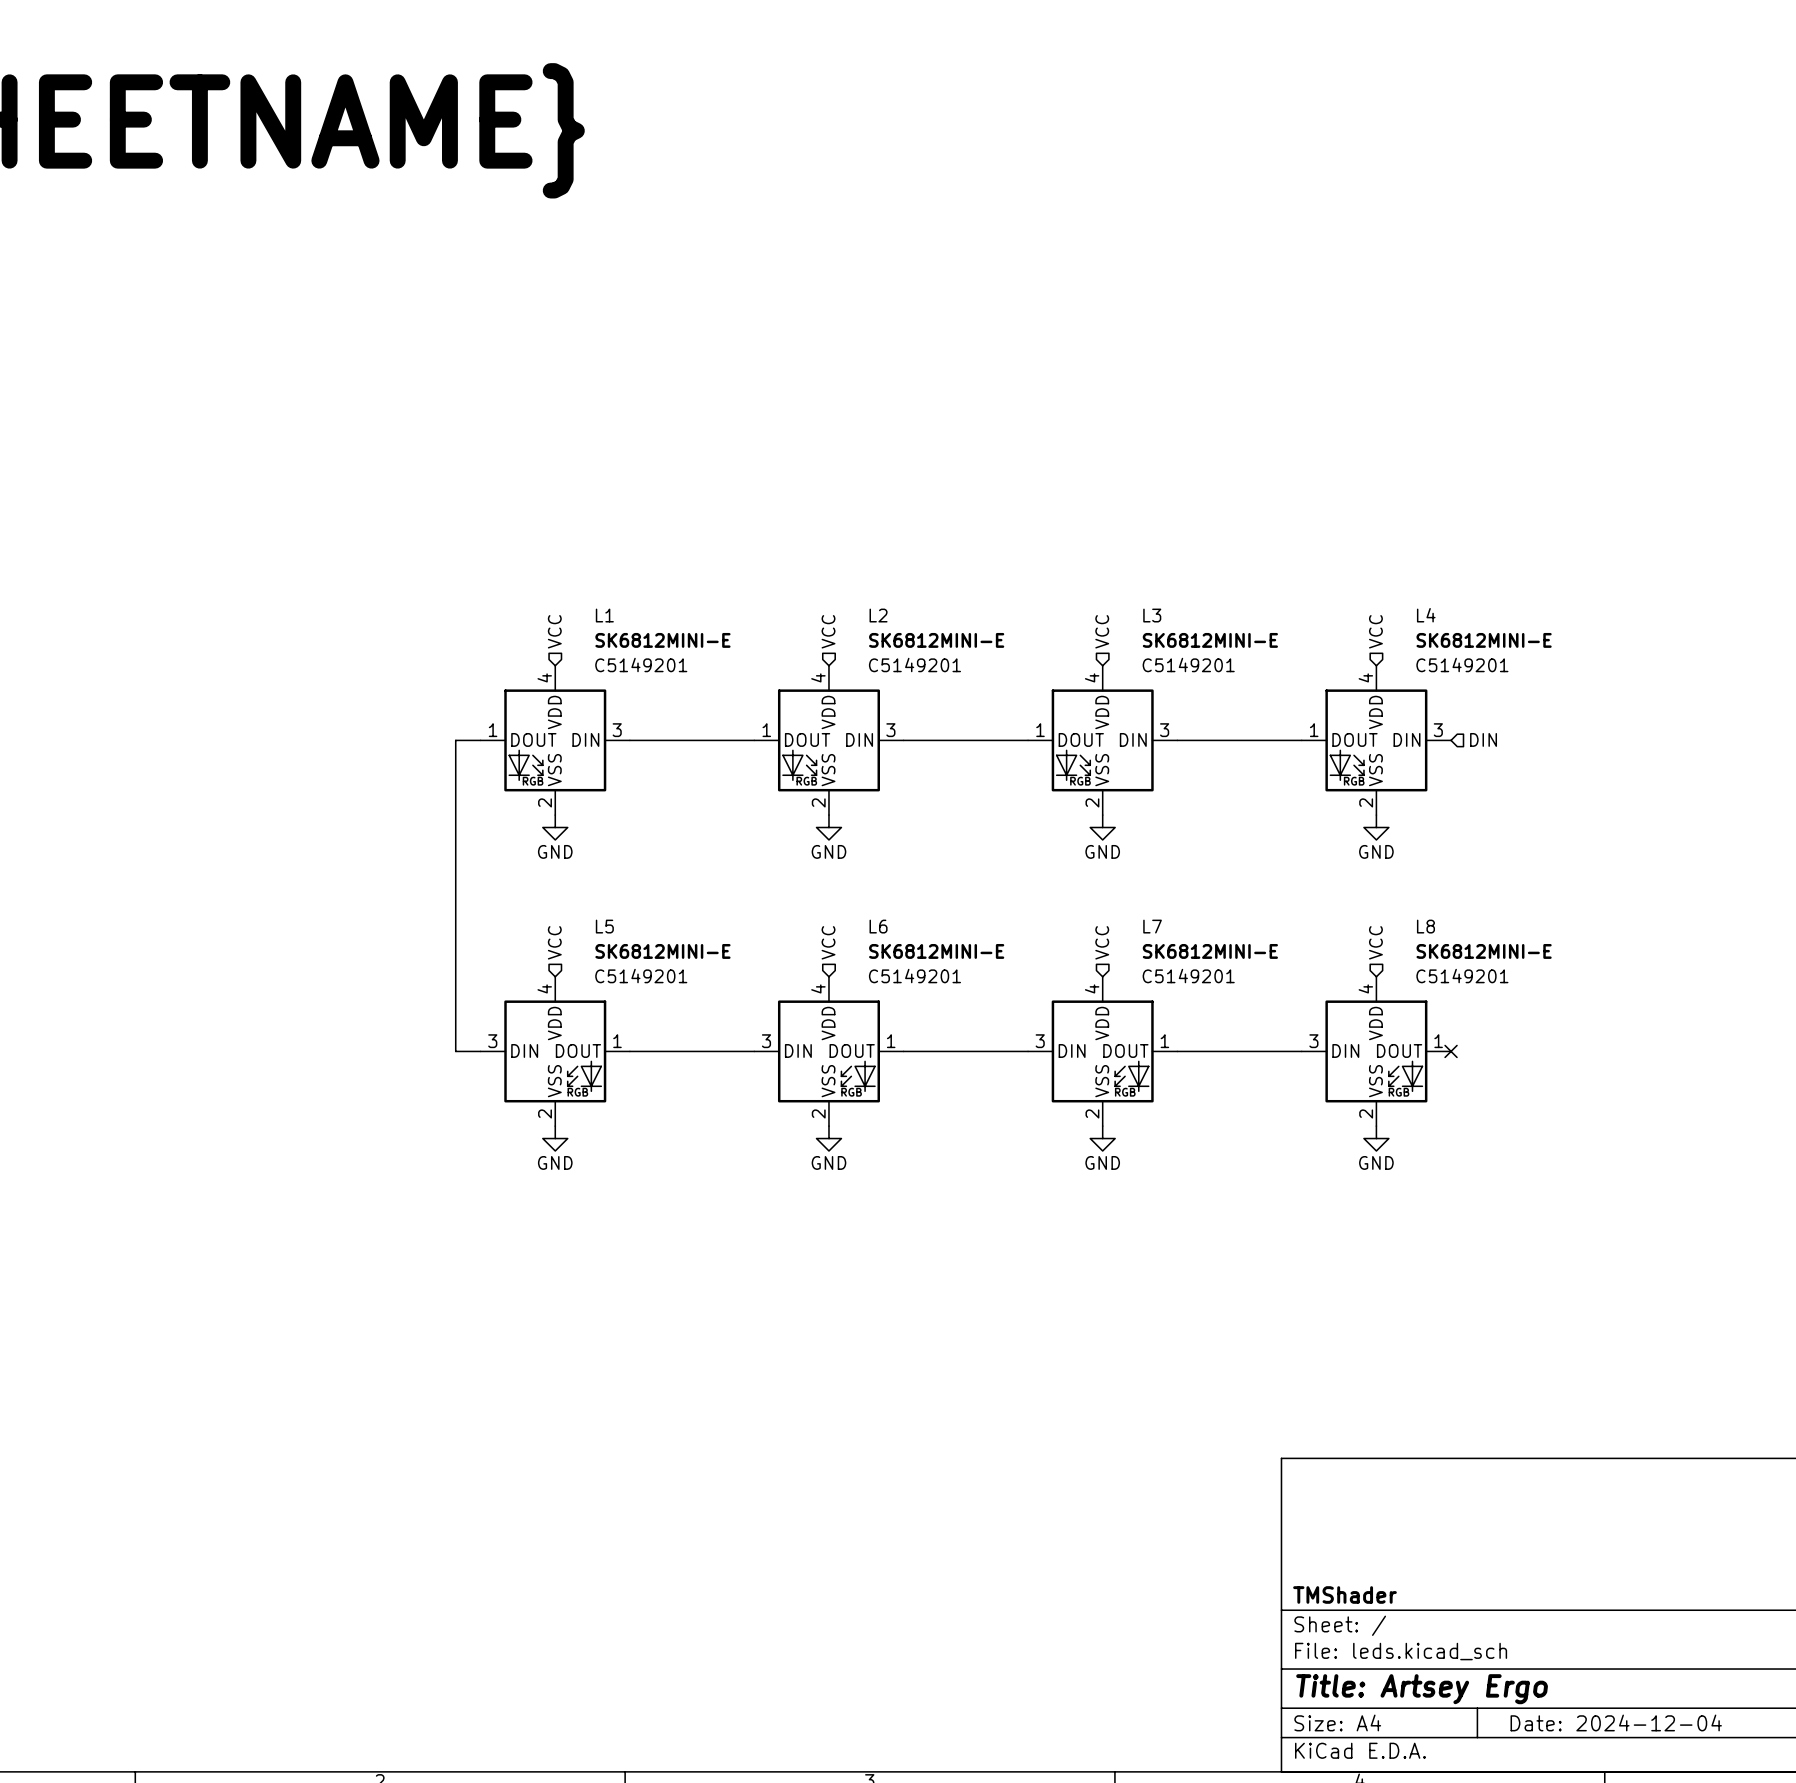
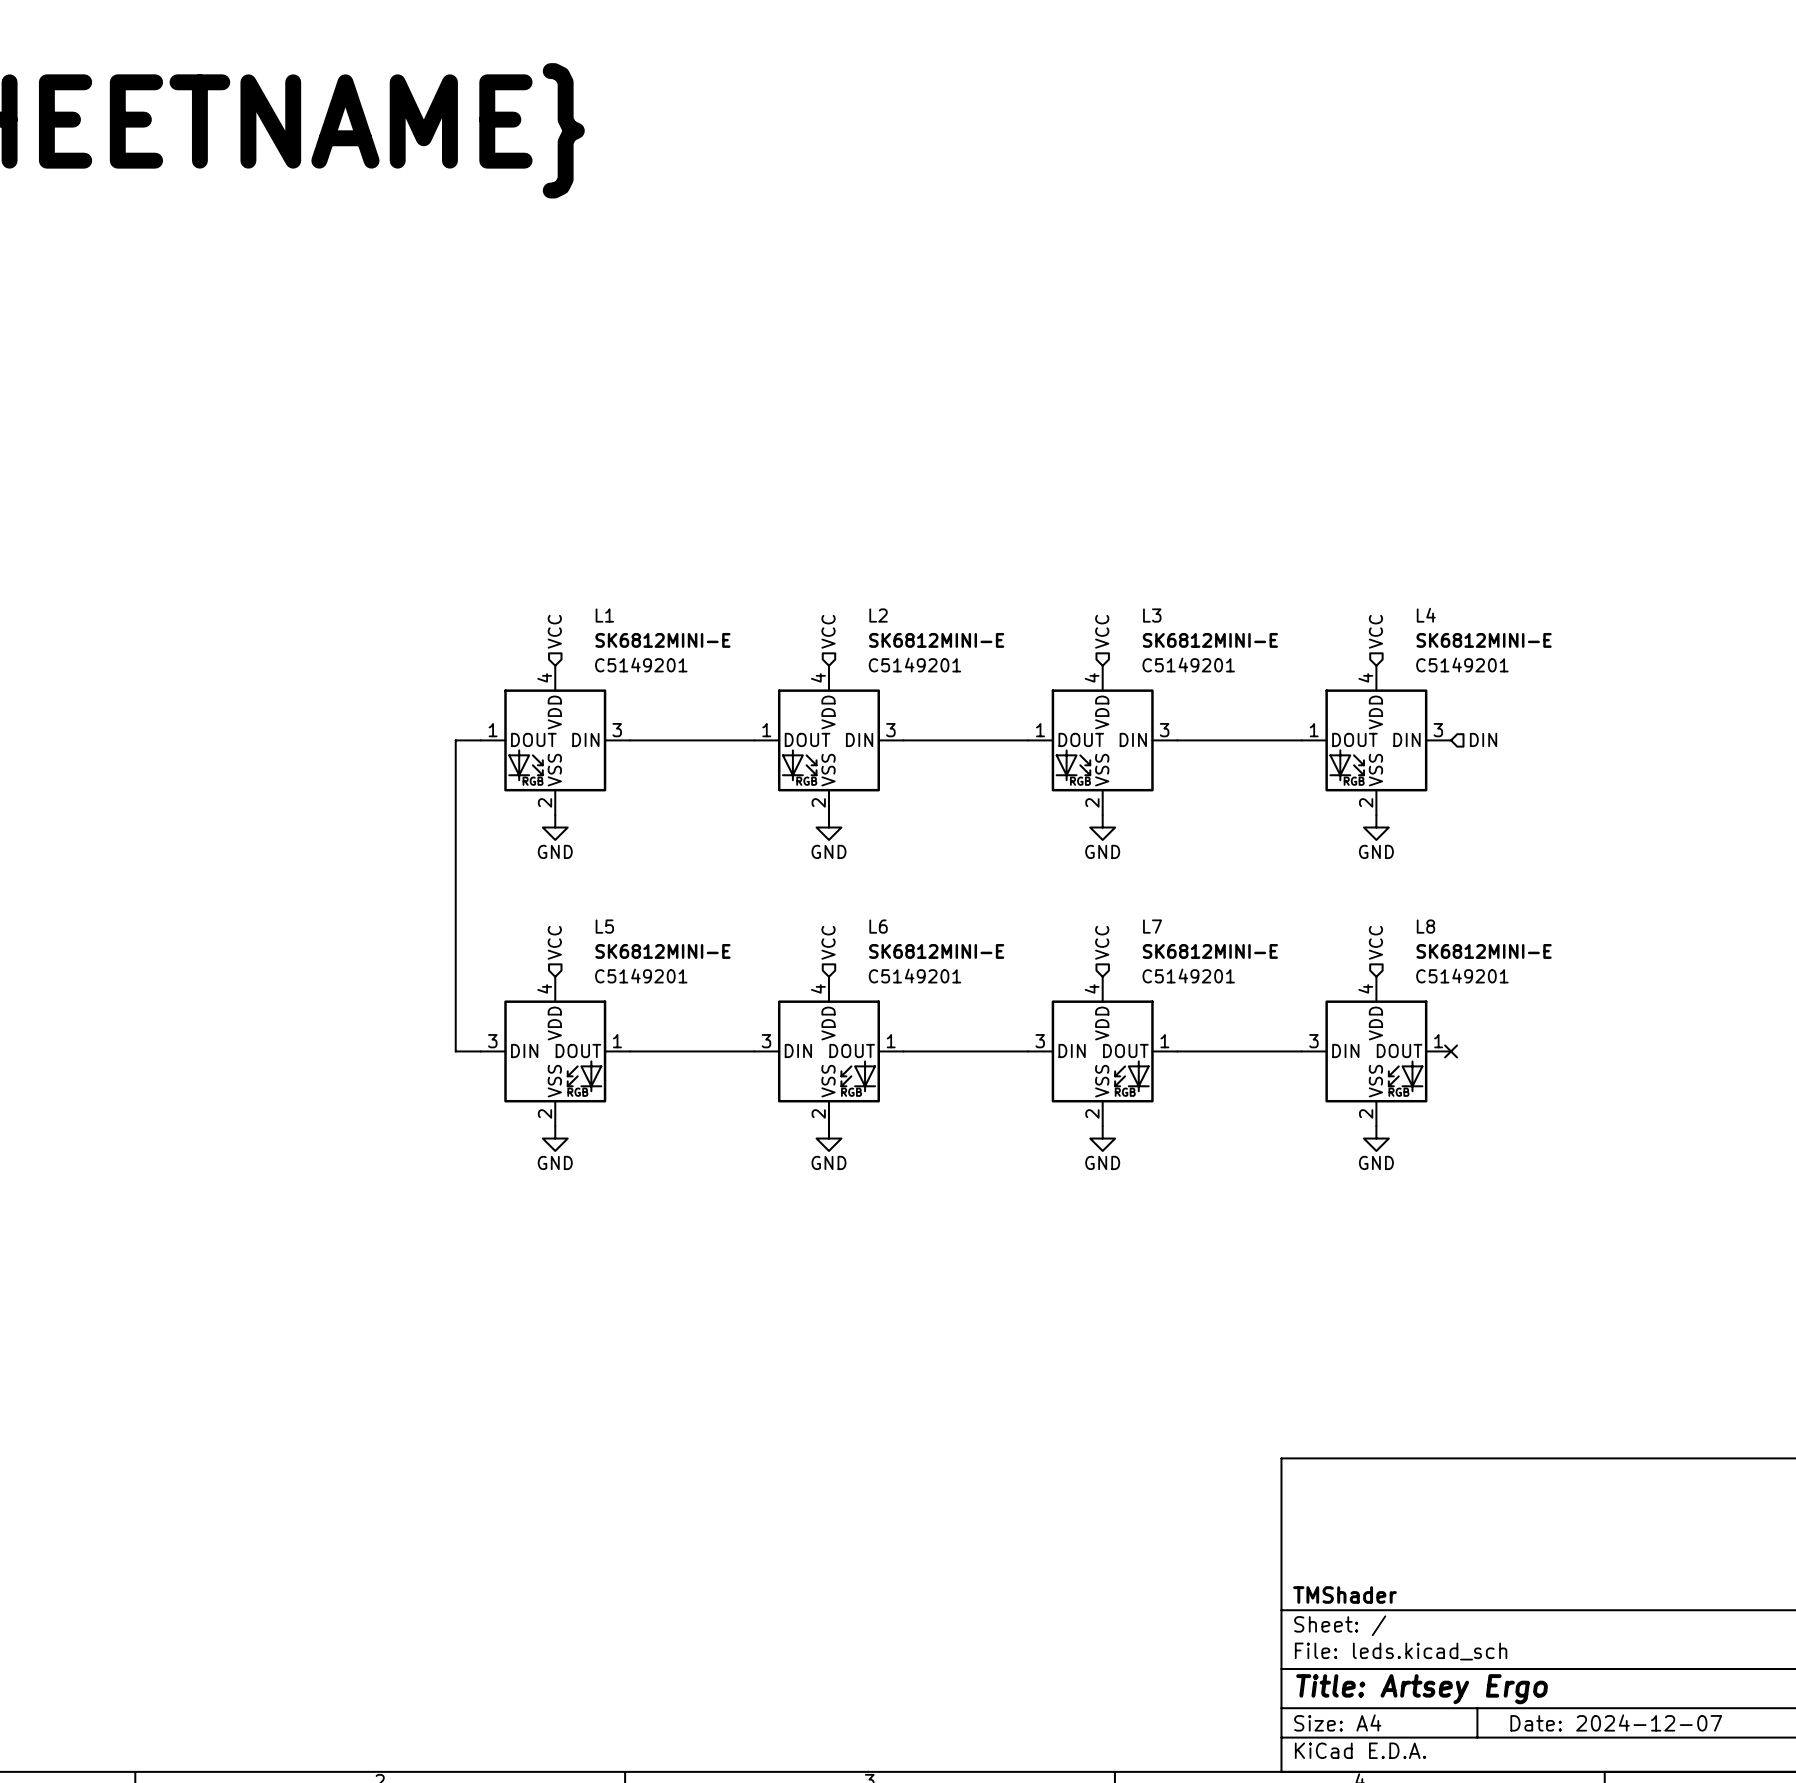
title block: Date: 2024-12-04 (1616, 1722) -> Date: 2024-12-07 (1616, 1722)

